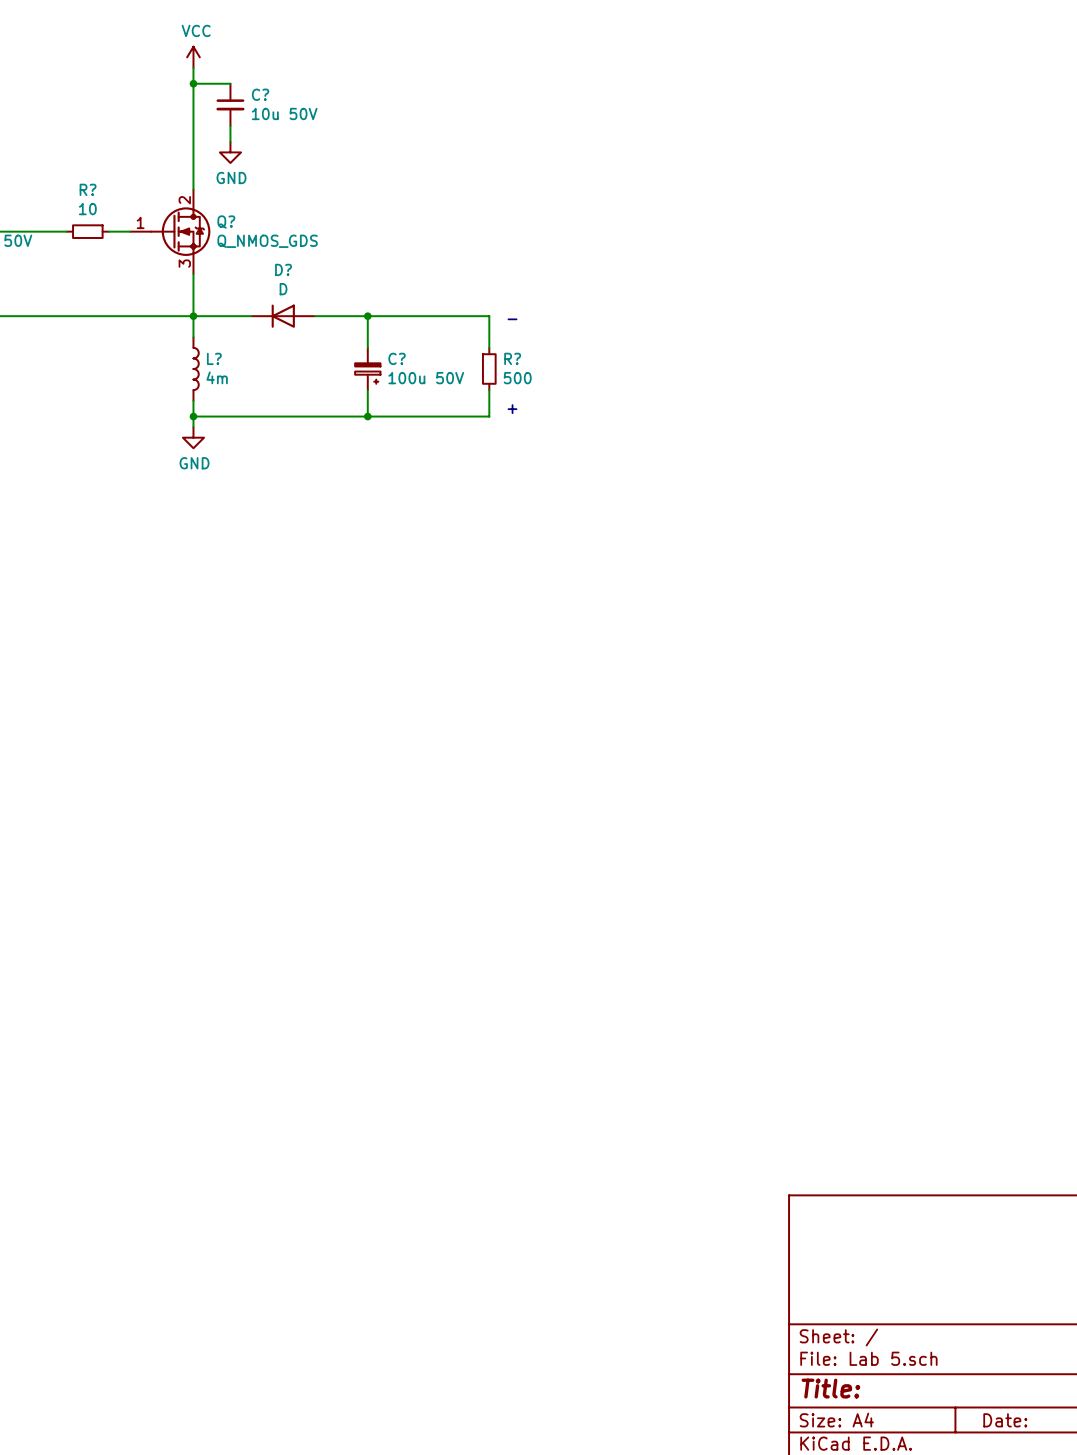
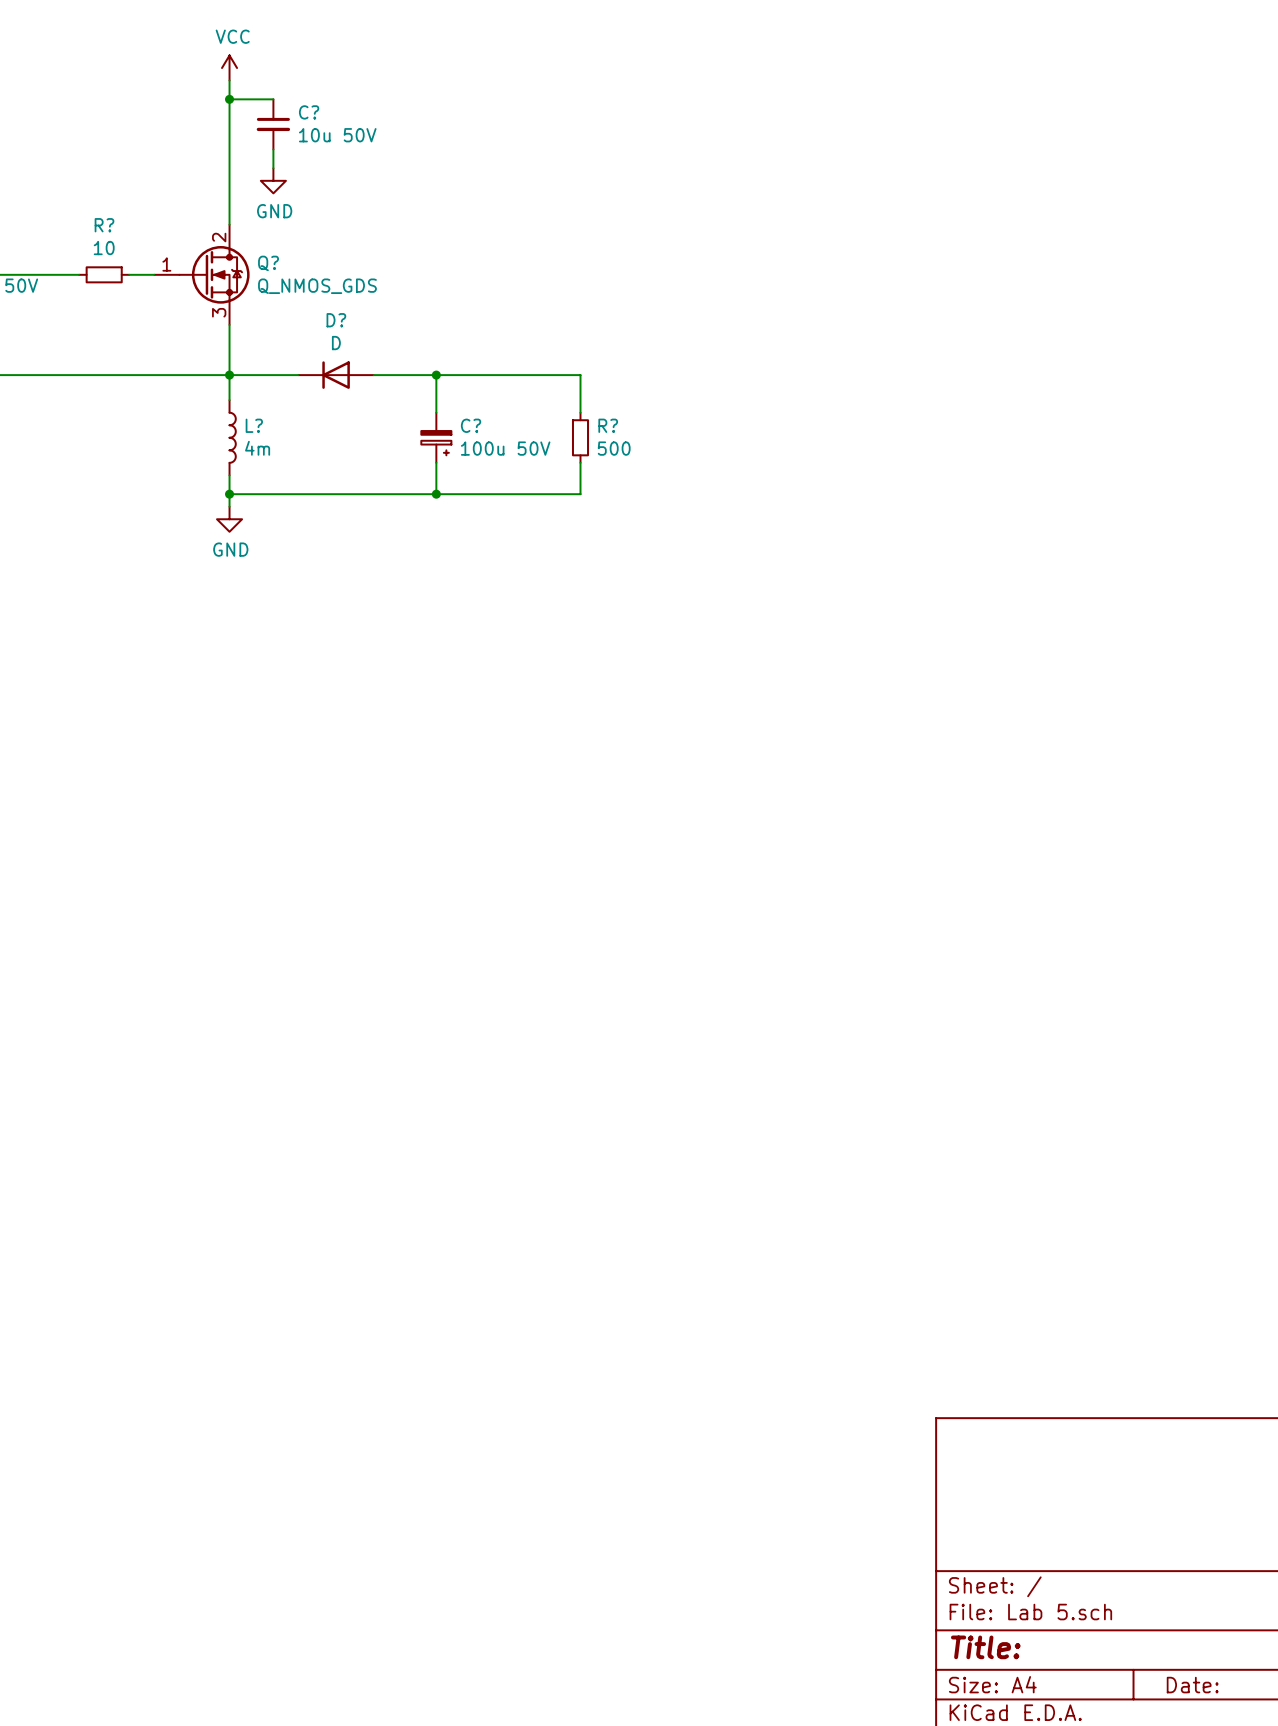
text: - (512, 319) -> none
text: + (512, 409) -> none

